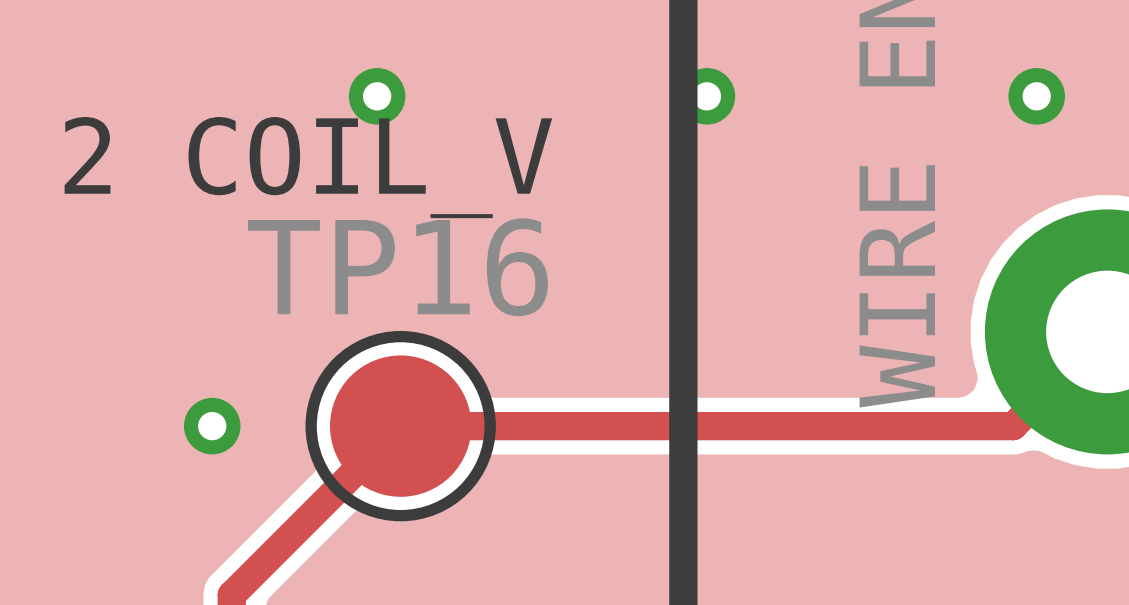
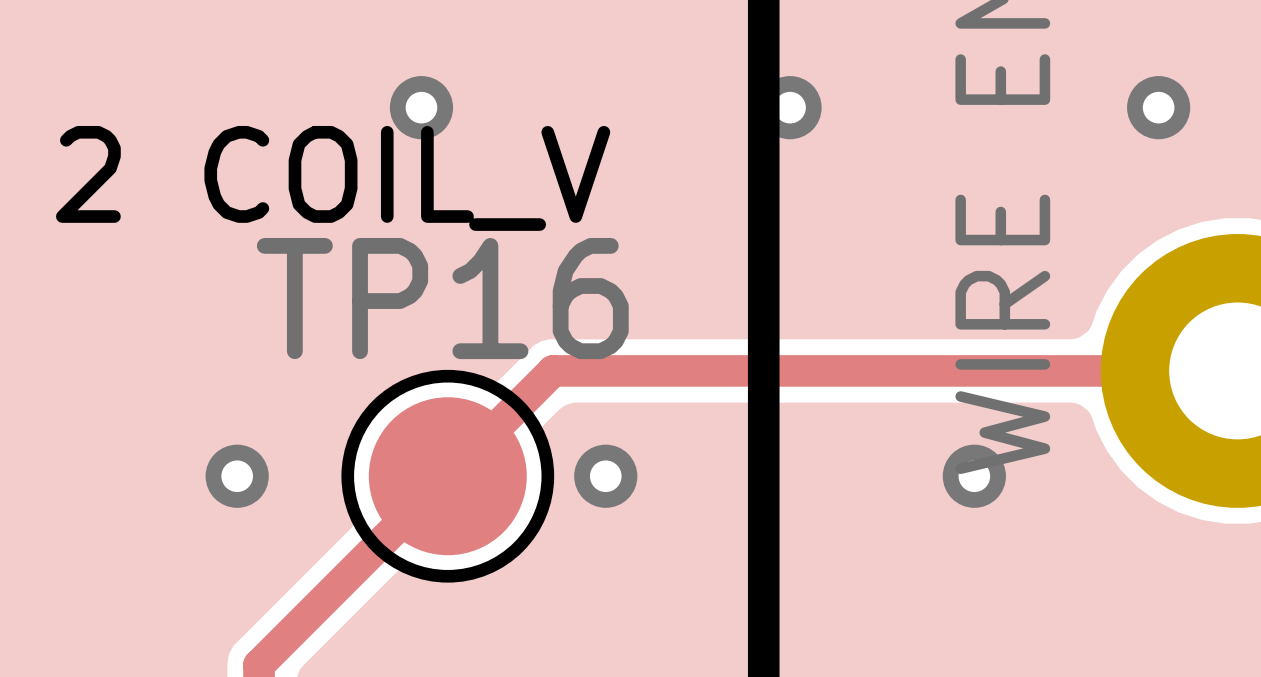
track: (1107, 331) (1013, 426) (400, 426) -> (1237, 370) (553, 370) (447, 476)
via: none -> (605, 476)
via: none -> (974, 476)

